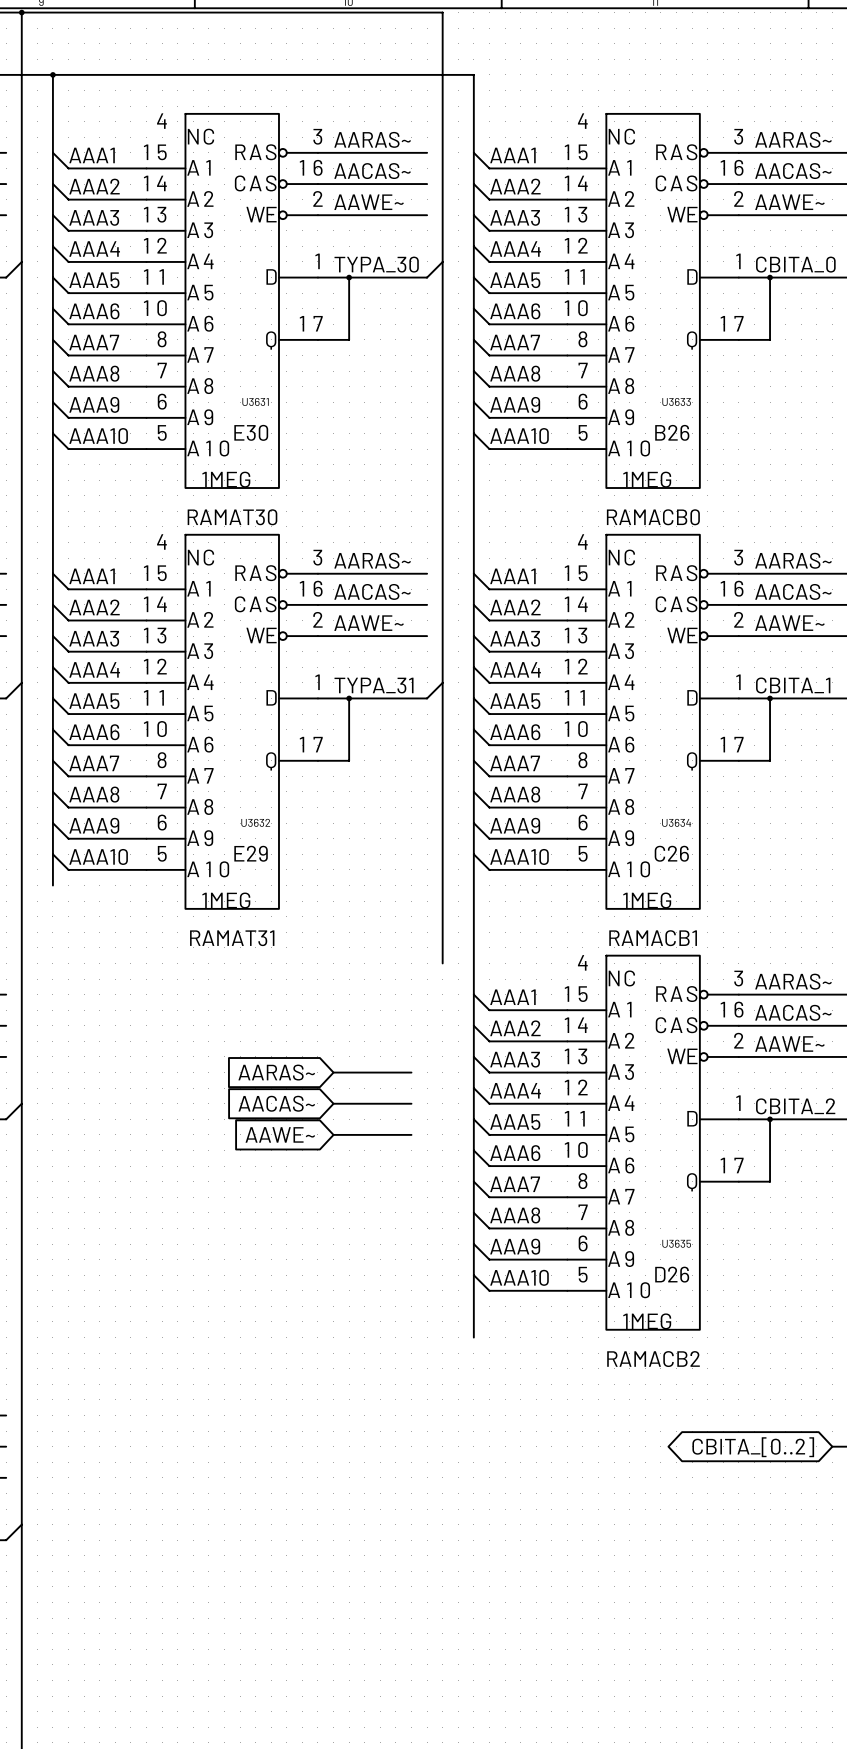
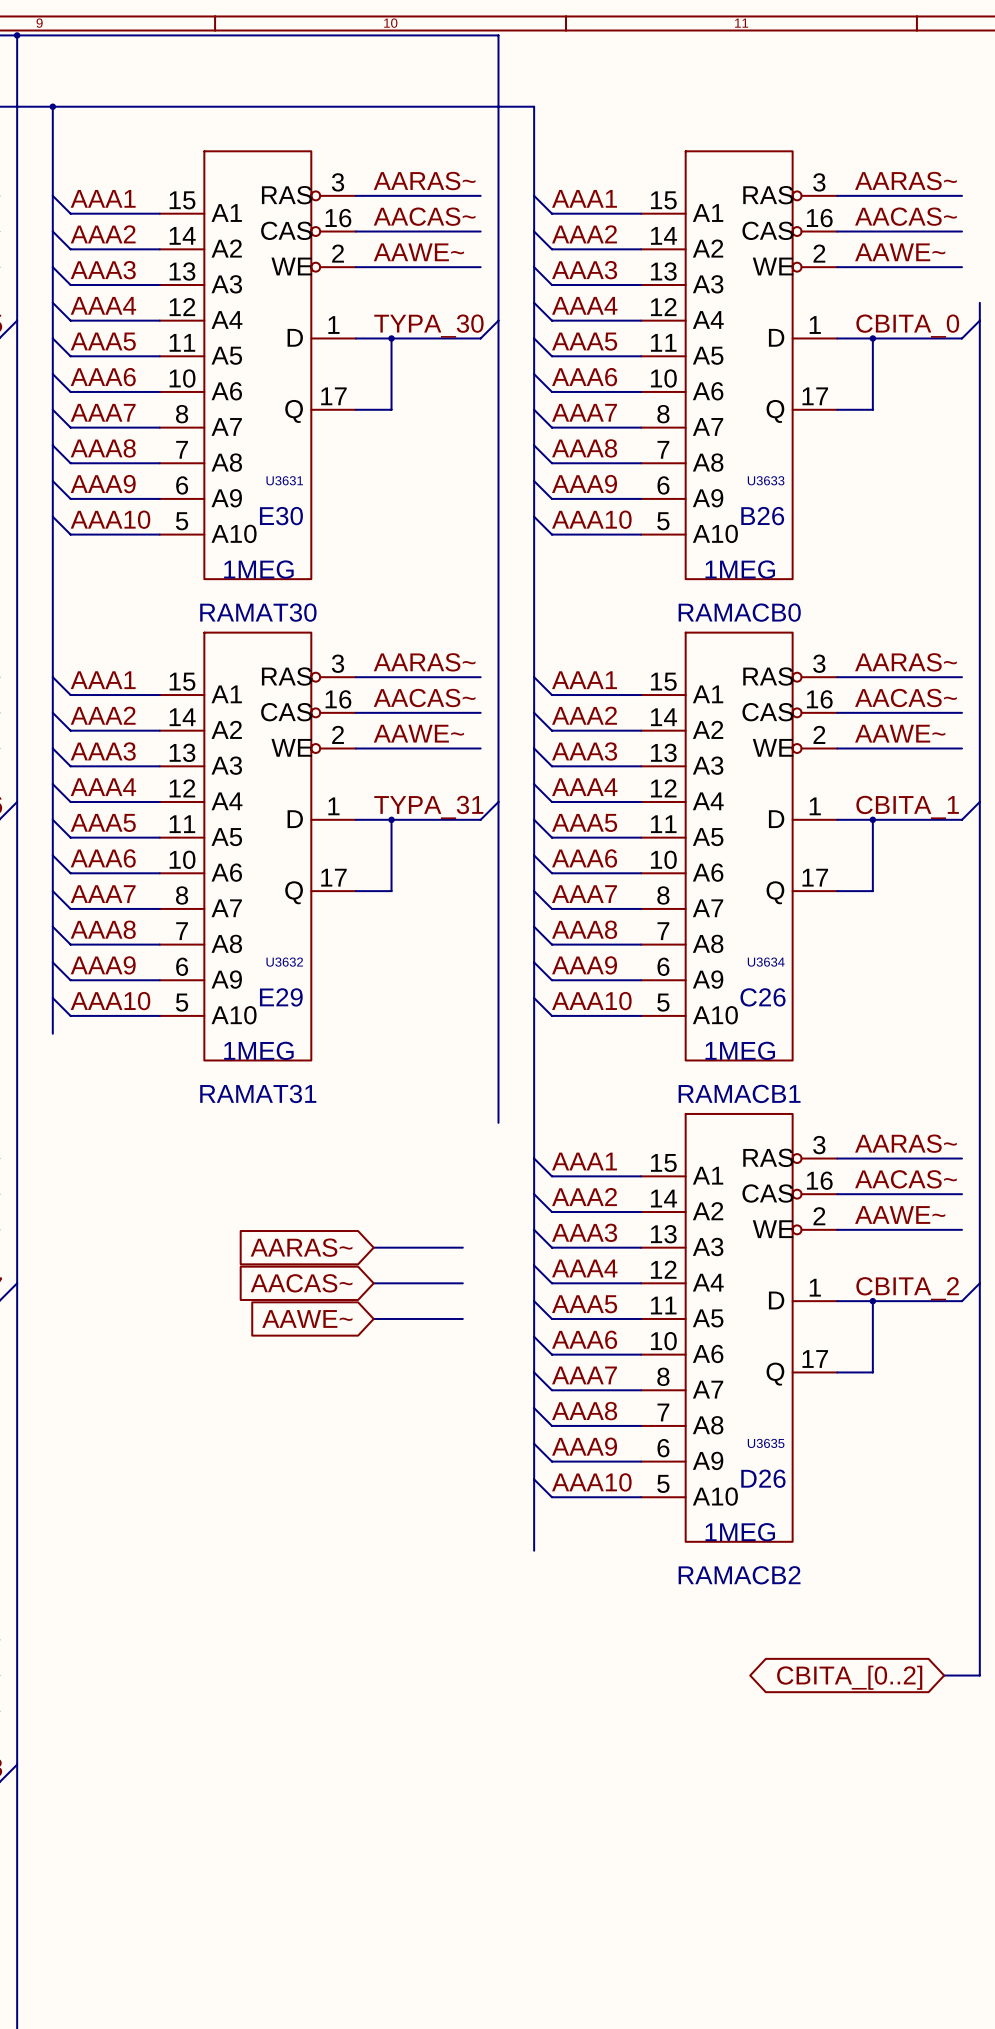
U3631 symbol: [146, 113, 318, 489] -> [159, 151, 356, 580]
U3633 symbol: [567, 113, 739, 489] -> [641, 151, 838, 580]
U3632 symbol: [146, 534, 318, 909] -> [159, 632, 356, 1061]
U3634 symbol: [567, 534, 739, 909] -> [641, 632, 838, 1061]
U3635 symbol: [567, 955, 739, 1330] -> [641, 1113, 838, 1542]

